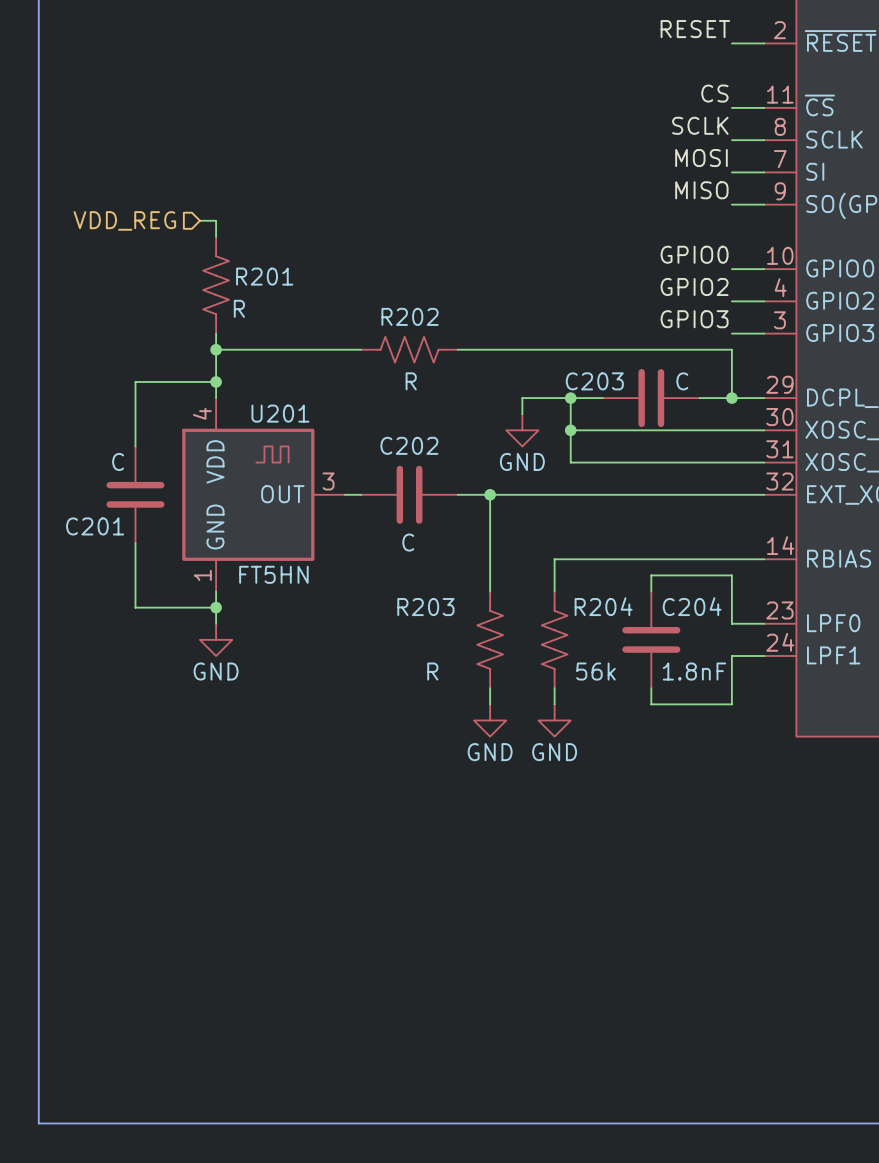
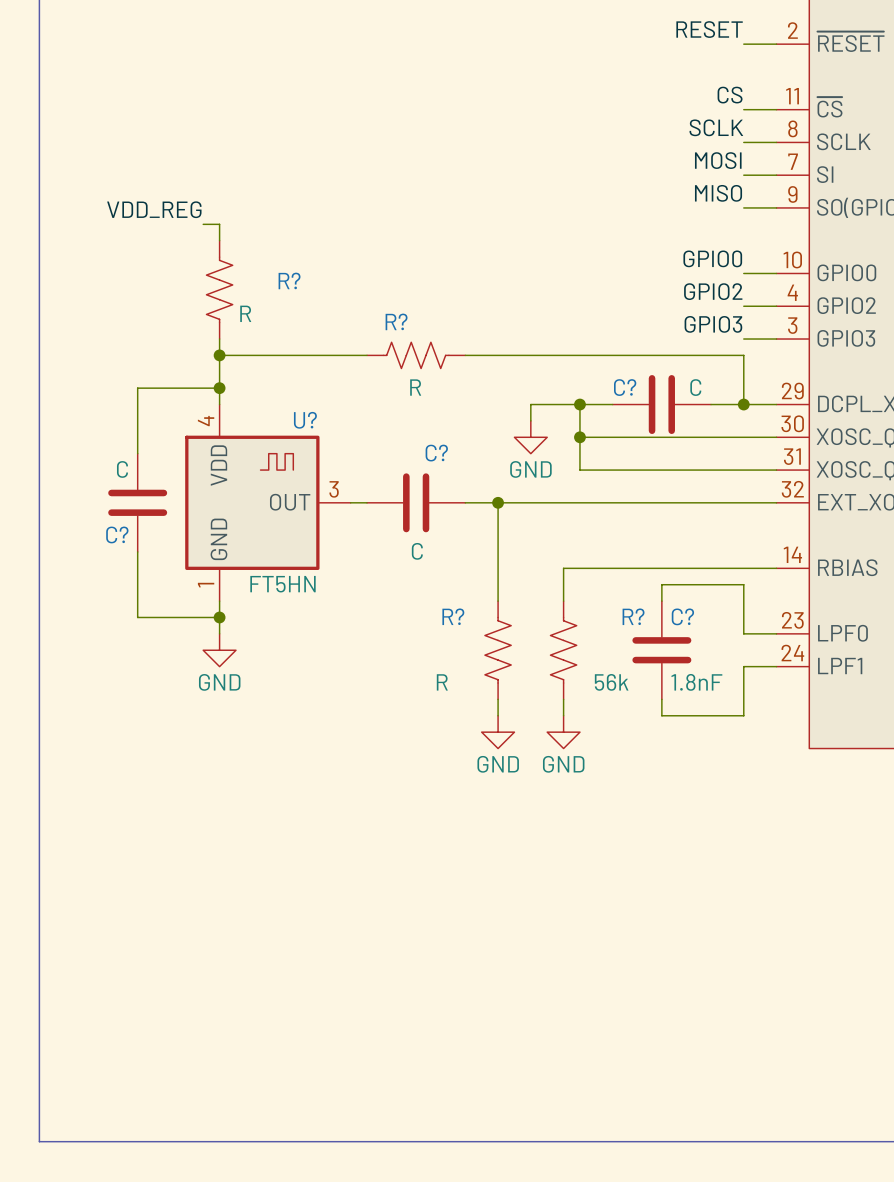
label: none -> VDD_REG (154, 209)
hierarchical label: VDD_REG (124, 220) -> none
R201 name: R201 (264, 276) -> R? (289, 280)
R202 name: R202 (410, 316) -> R? (396, 321)
C203 name: C203 (594, 381) -> C? (625, 387)
U201 name: U201 (280, 413) -> U? (305, 420)
C202 name: C202 (409, 445) -> C? (436, 453)
C201 name: C201 (95, 526) -> C? (117, 534)
R204 name: R204 (603, 606) -> R? (633, 616)
C204 name: C204 (692, 606) -> C? (682, 616)
R203 name: R203 (425, 607) -> R? (453, 616)

